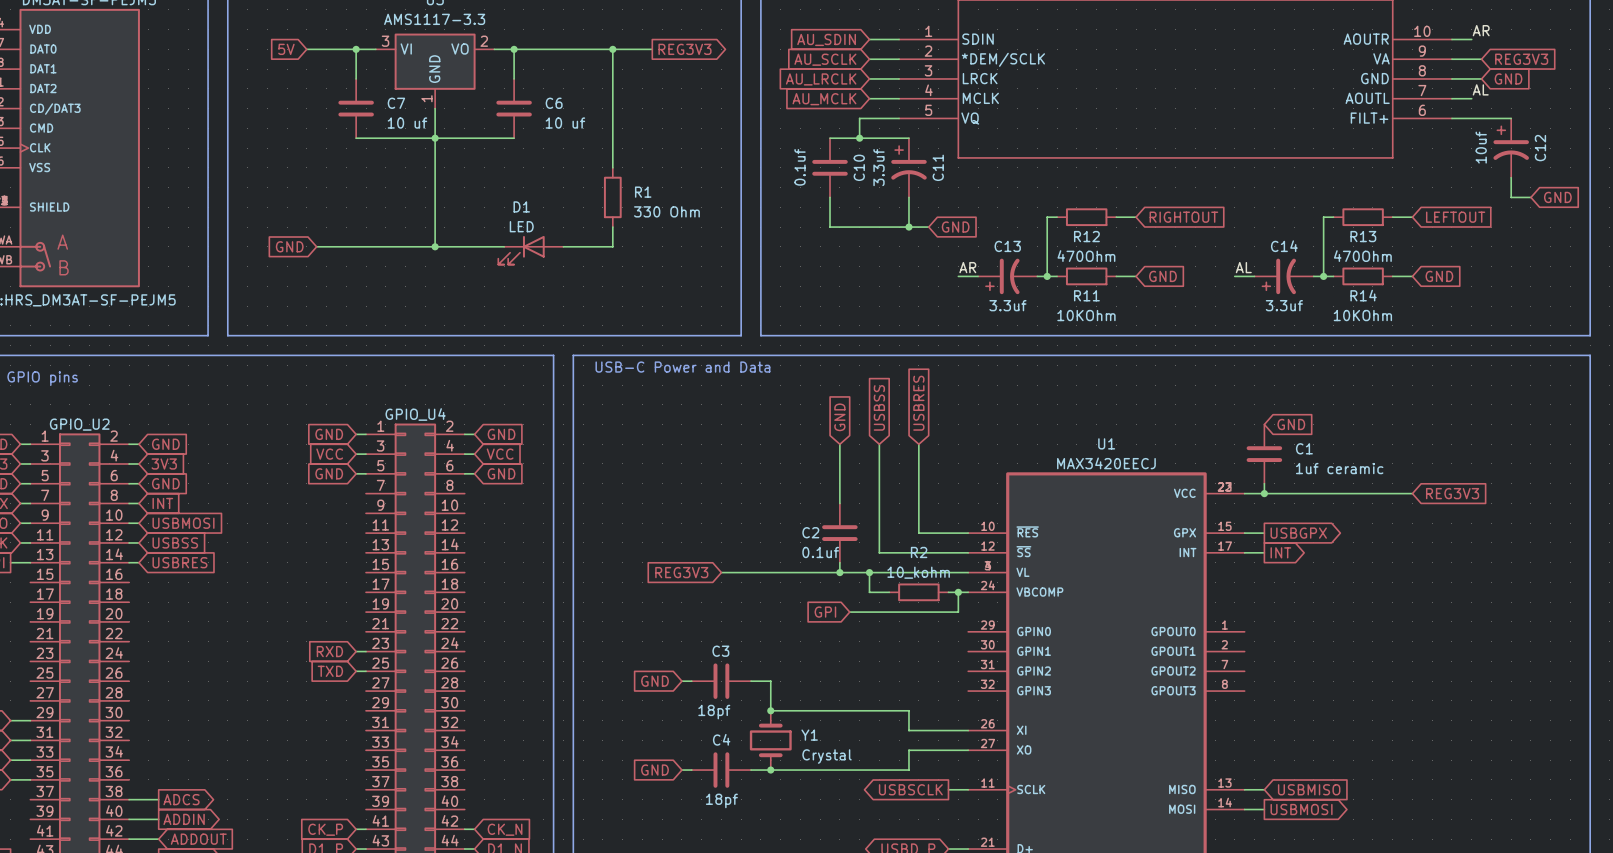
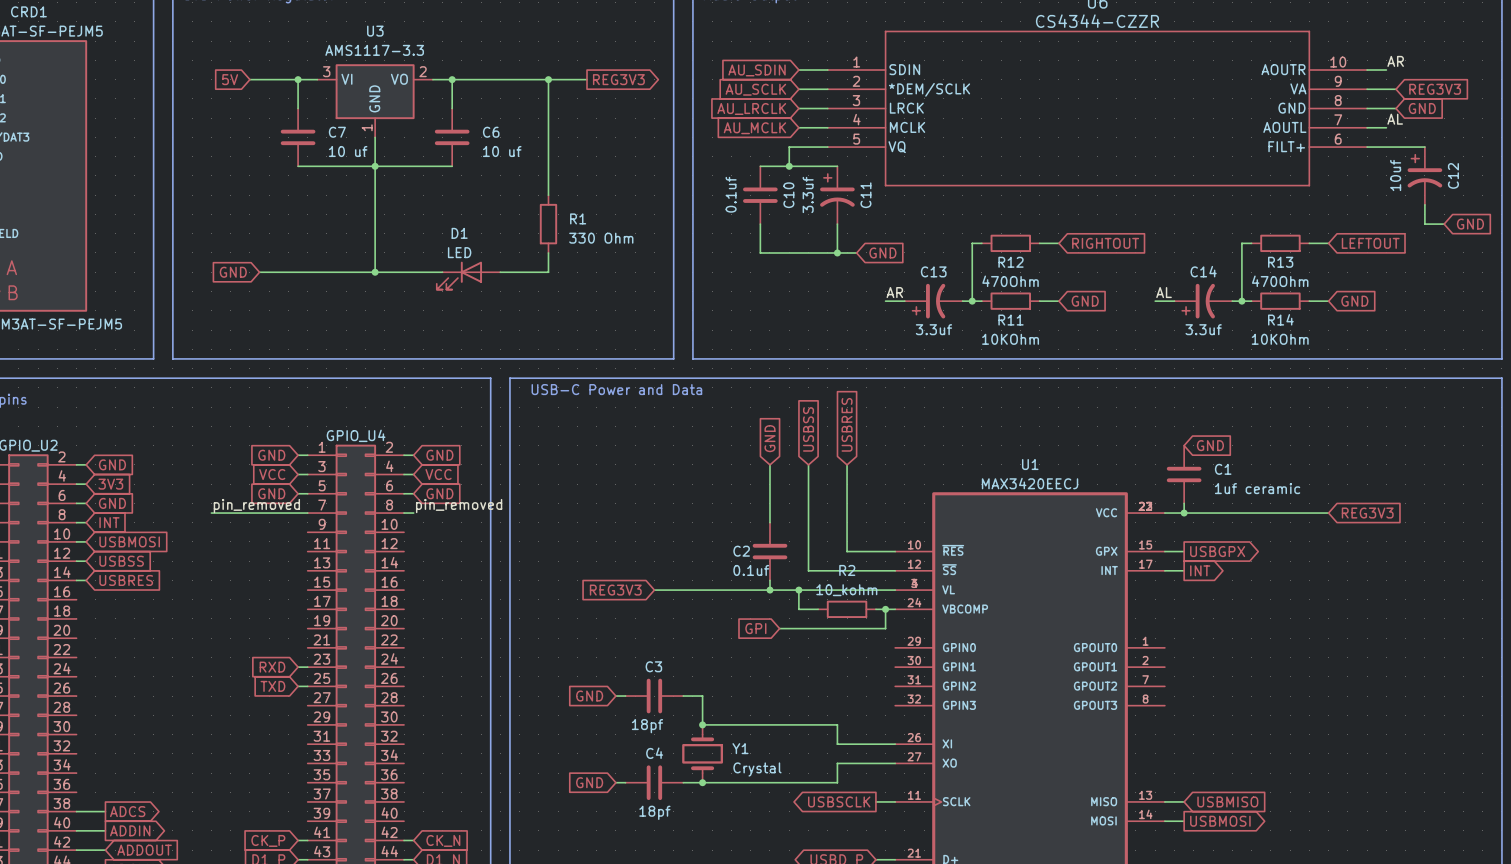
label: none -> pin_removed (256, 506)
label: none -> pin_removed (459, 506)
wire: none -> (211, 513) (307, 513)
wire: none -> (404, 513) (413, 513)

